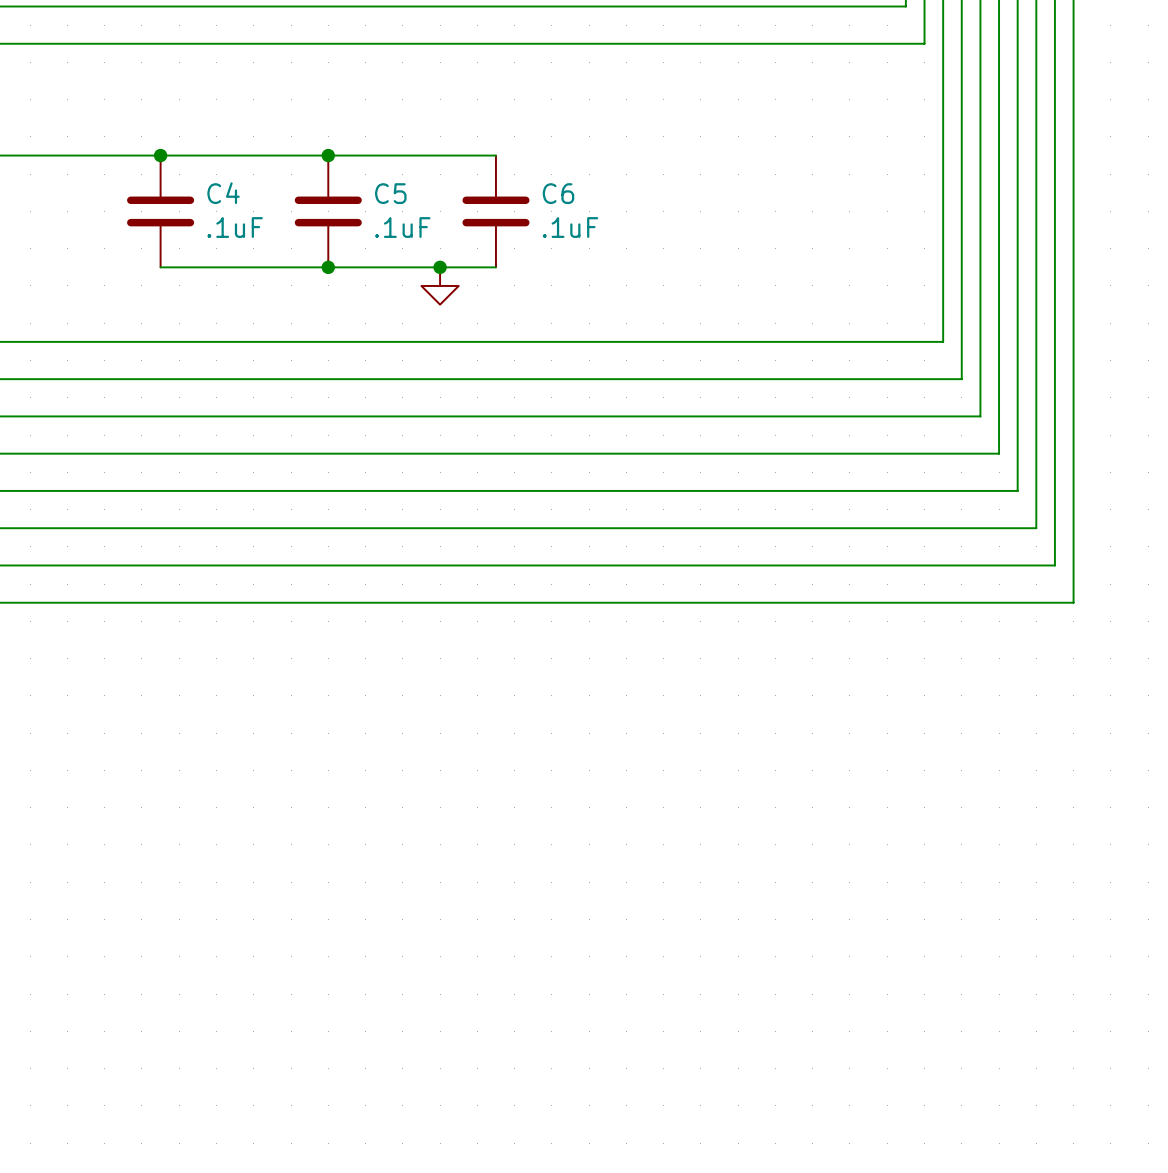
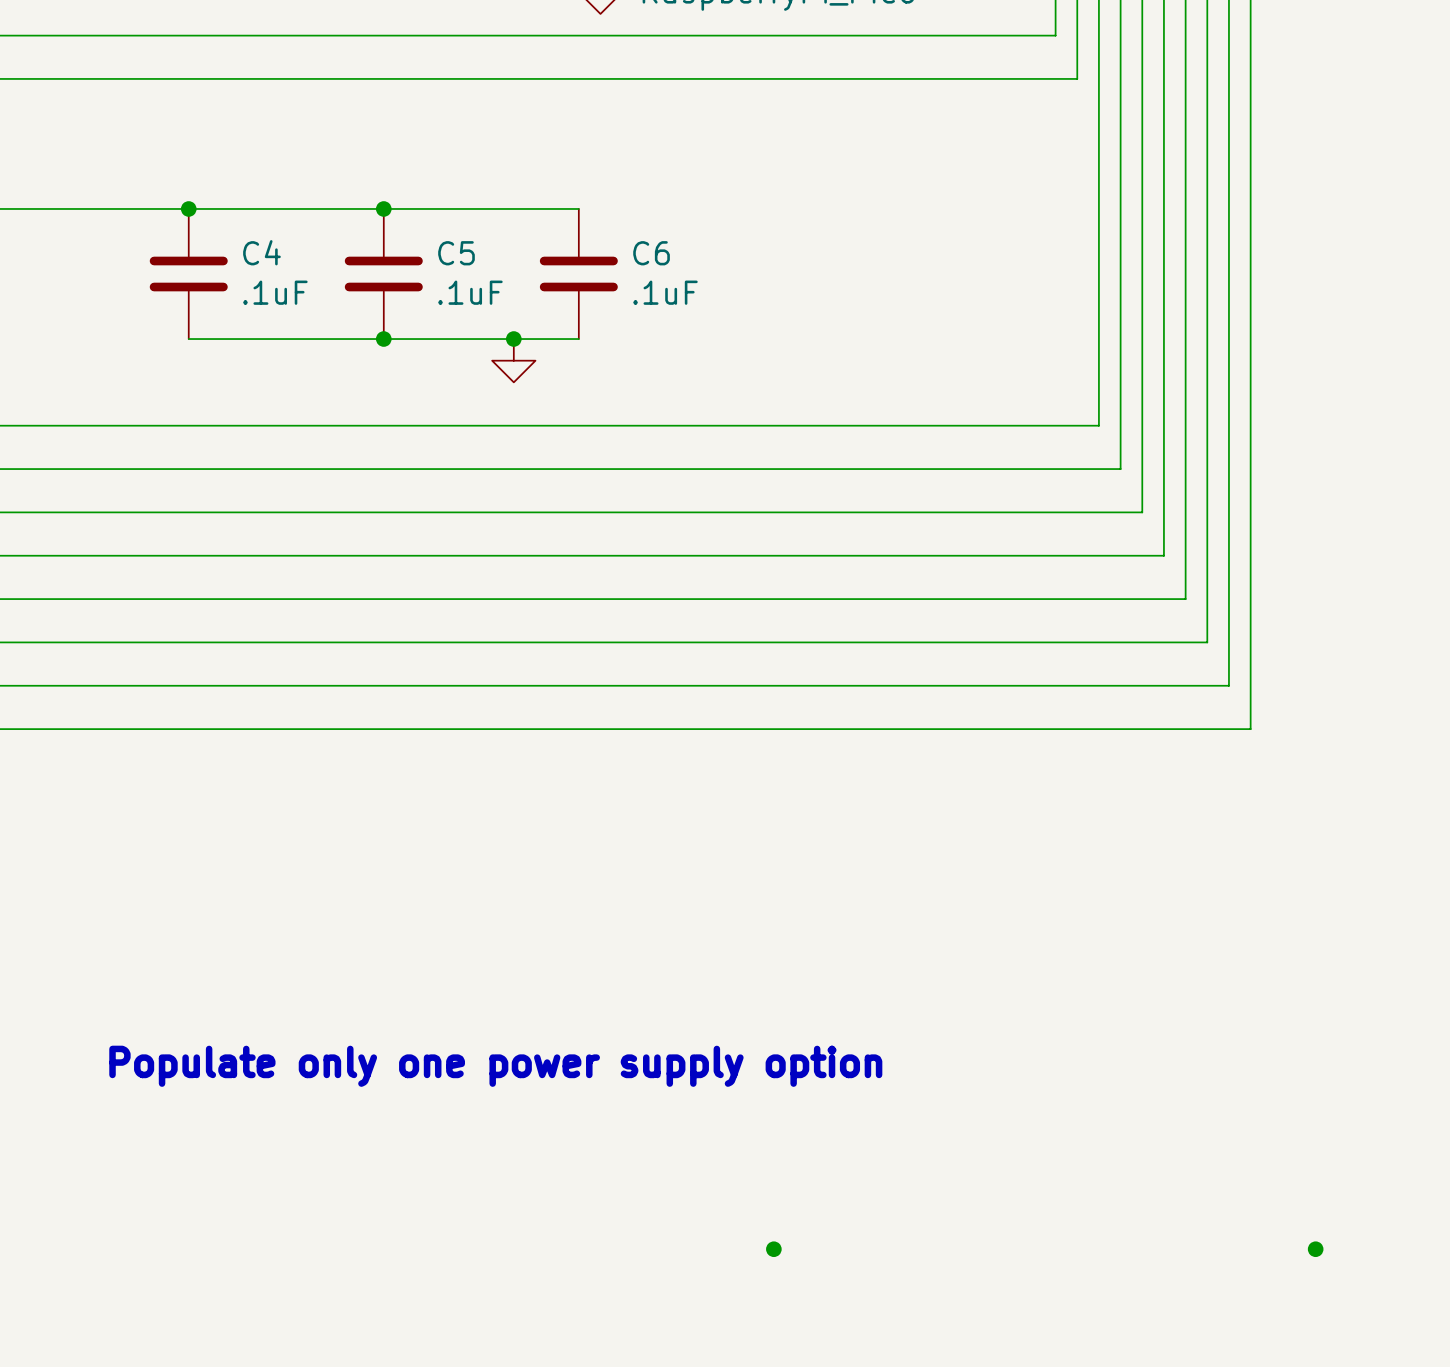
text: none -> Populate only one power supply option (495, 1066)
junction: none -> (773, 1249)
junction: none -> (1315, 1249)

